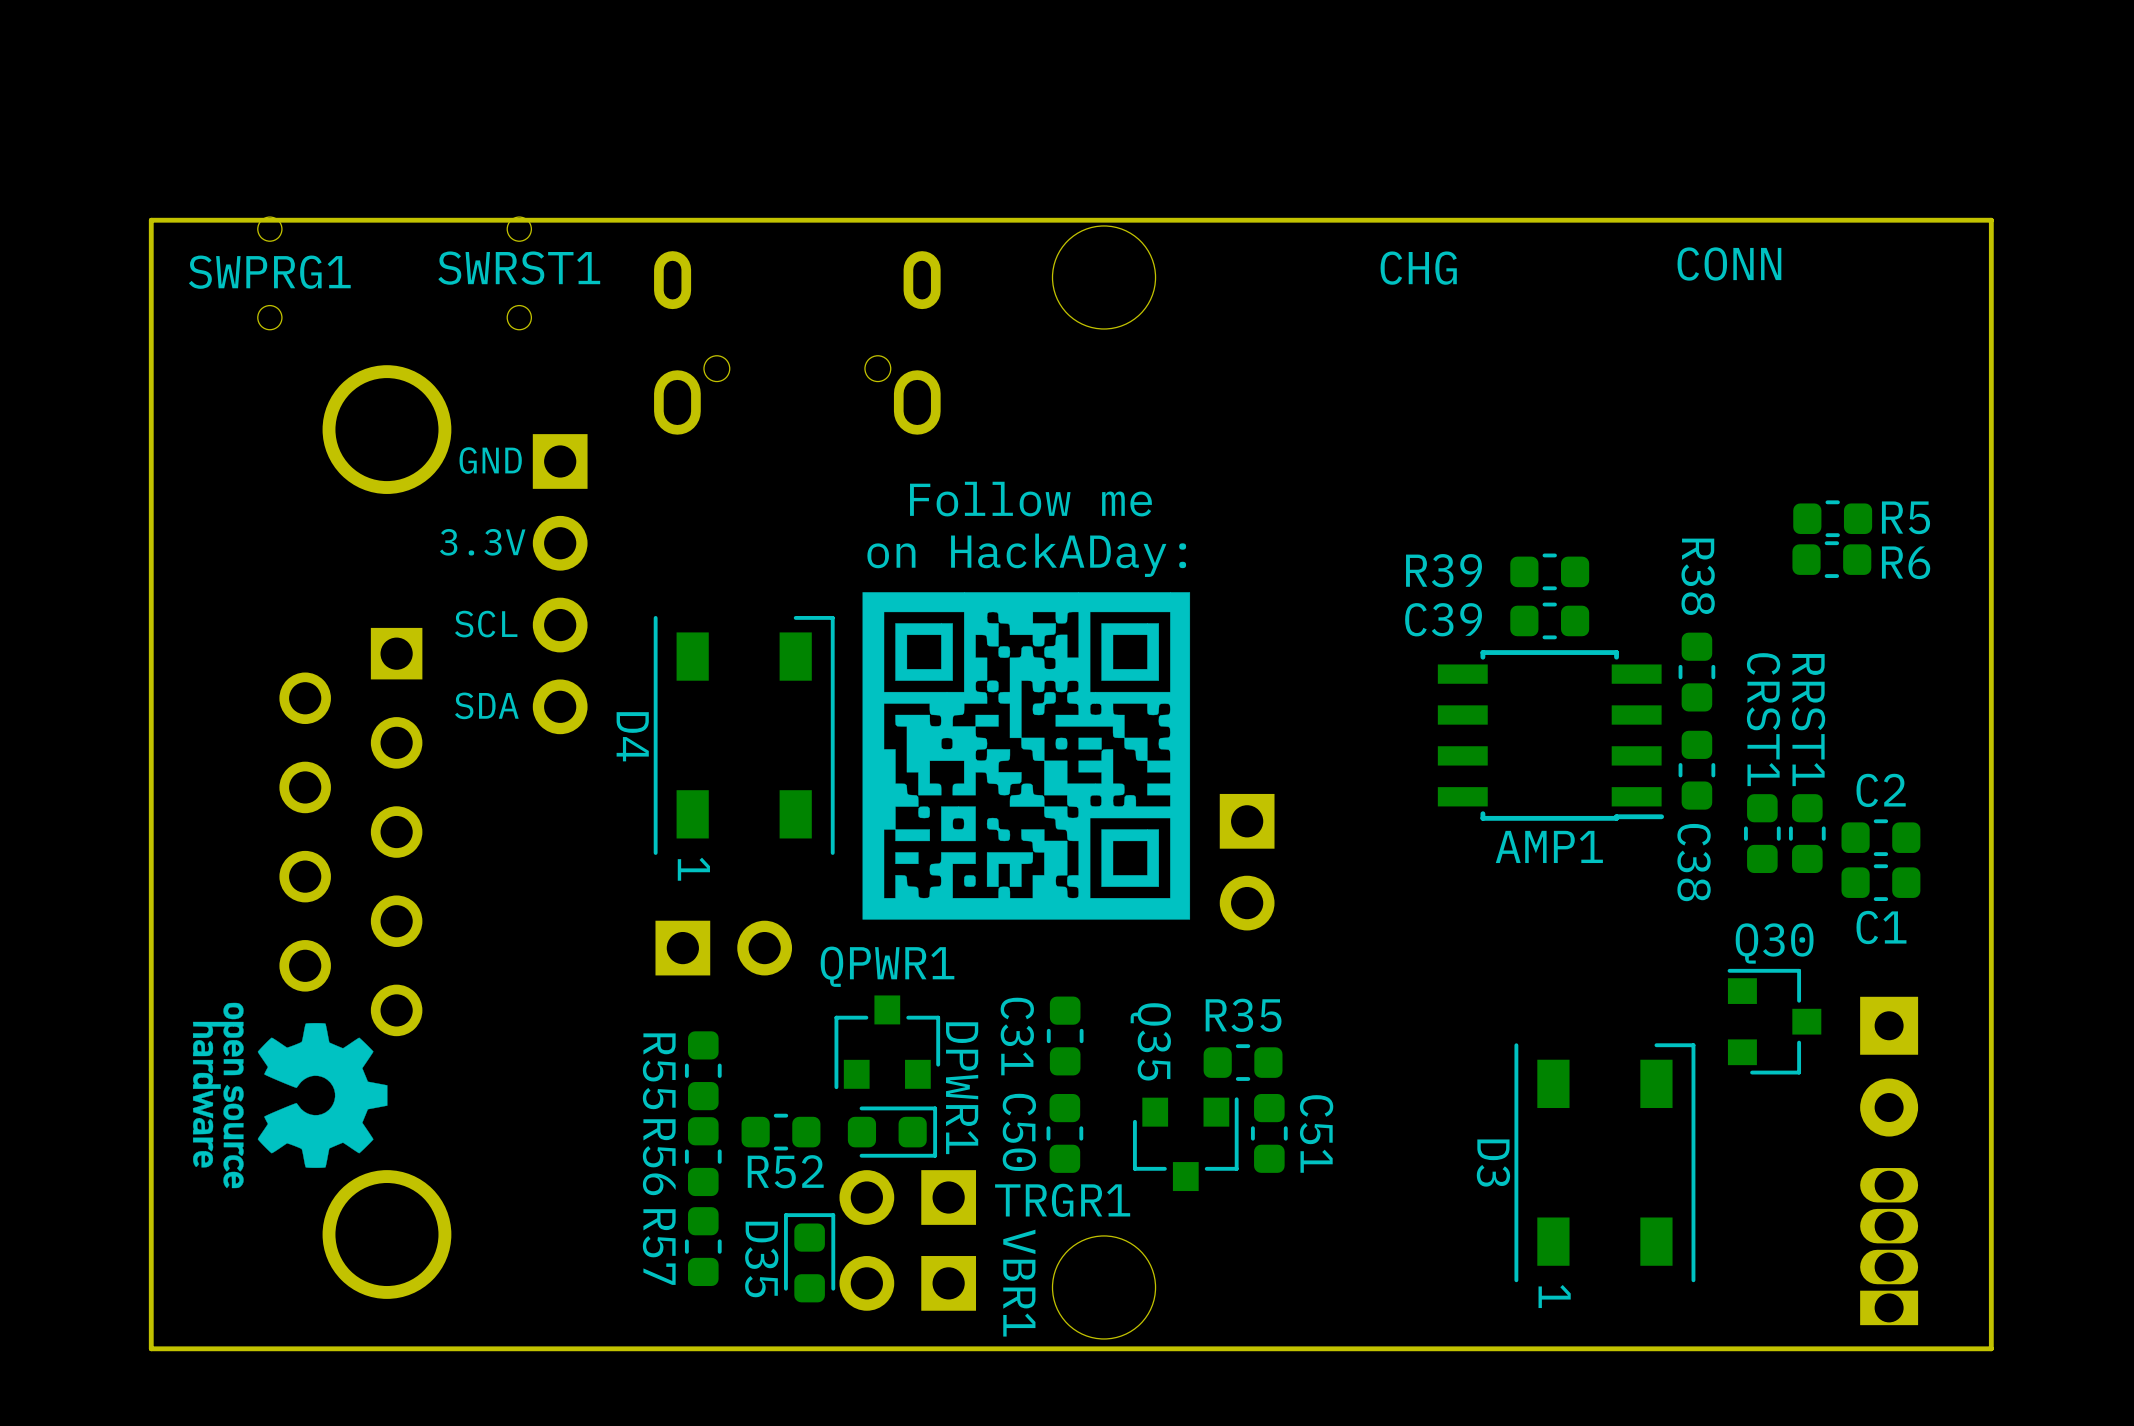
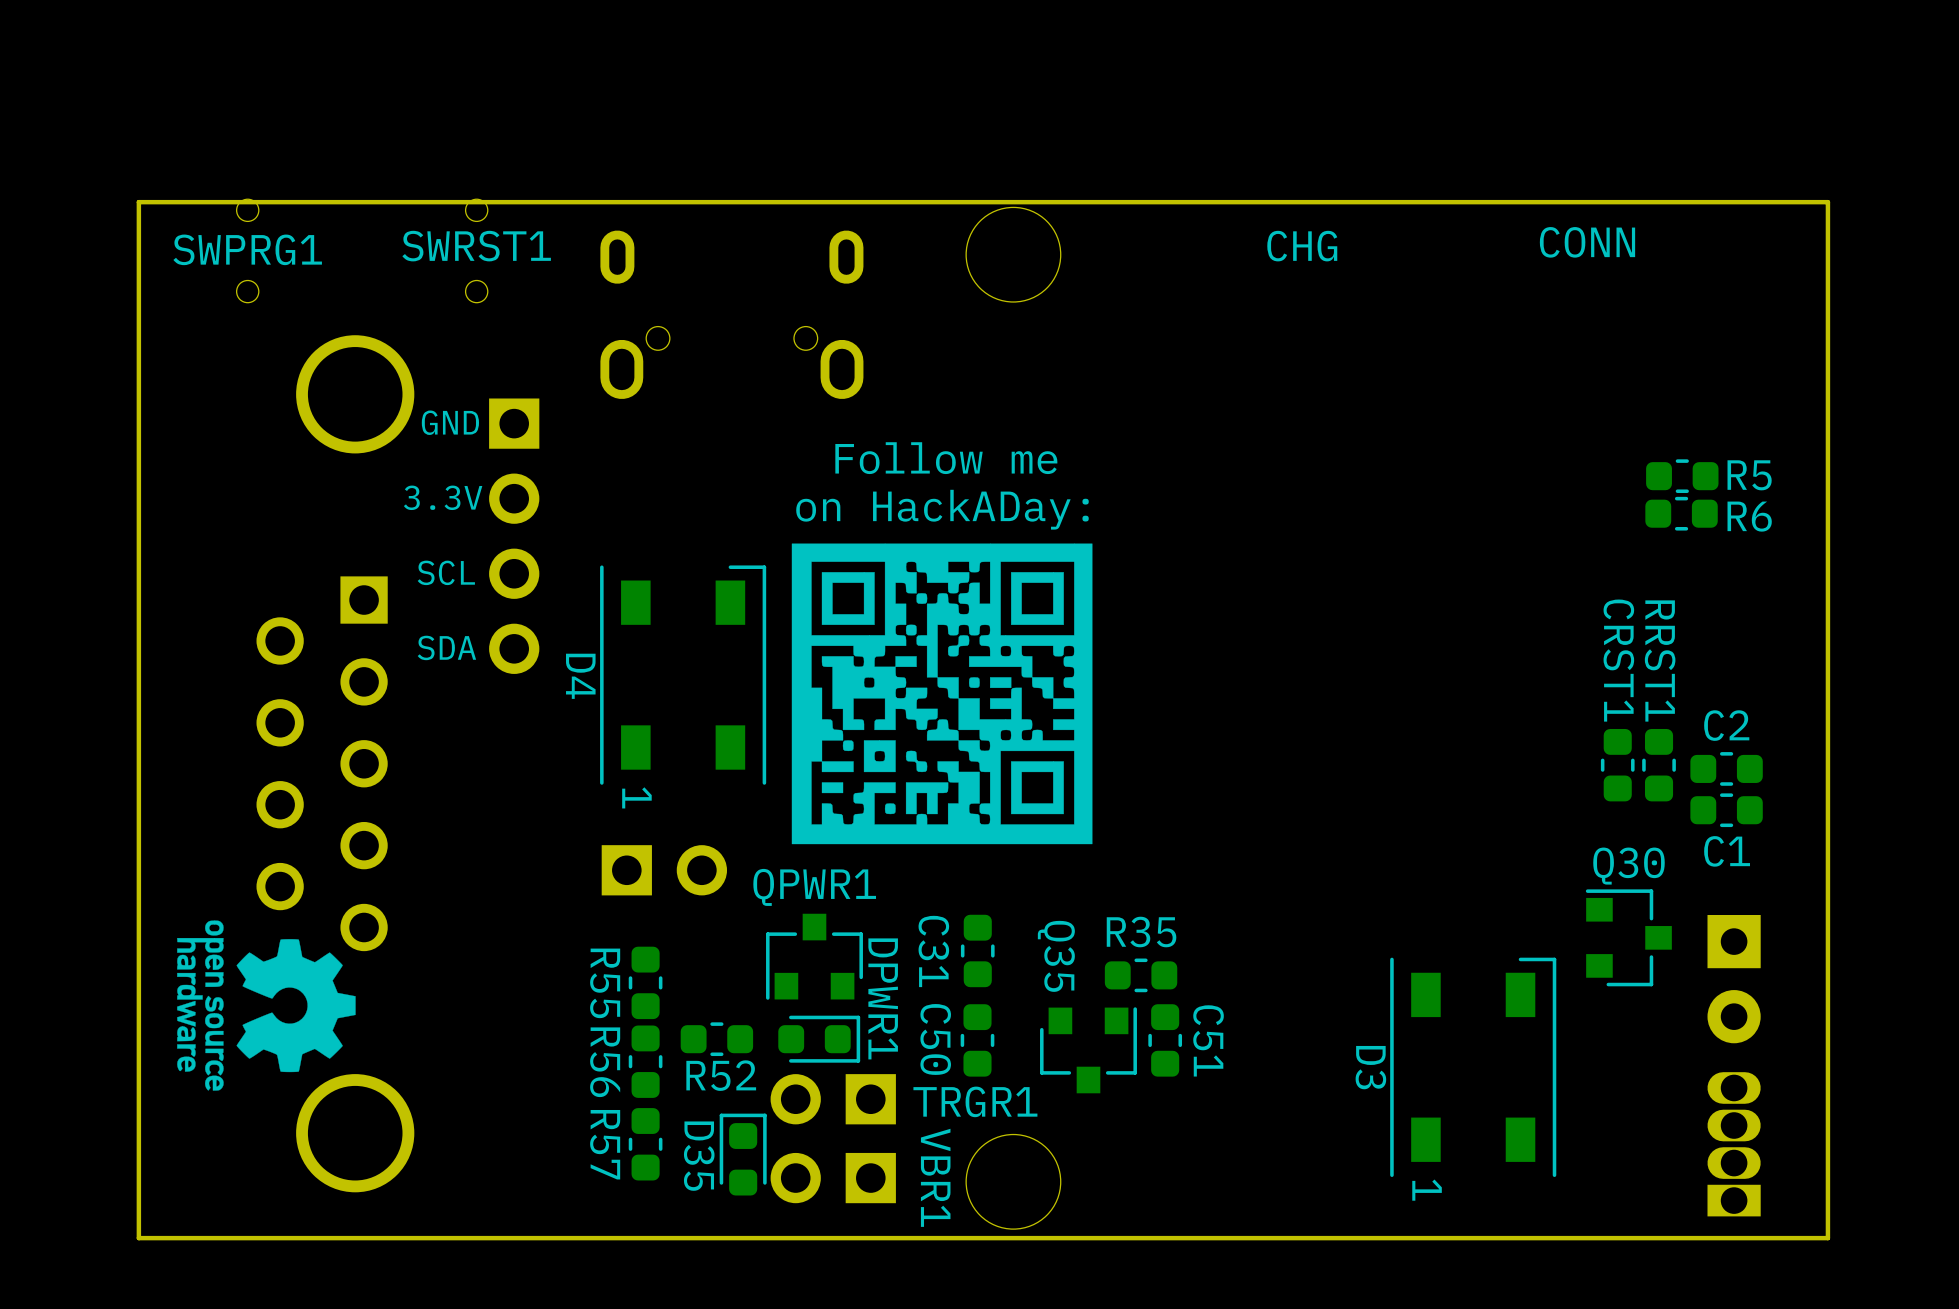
R39: (1549, 571) -> none
C39: (1549, 620) -> none
R38: (1696, 672) -> none
AMP1: (1550, 735) -> none
C38: (1696, 770) -> none
part: (1247, 862) -> none

